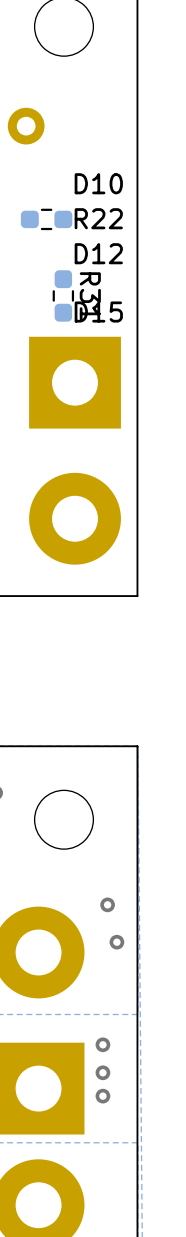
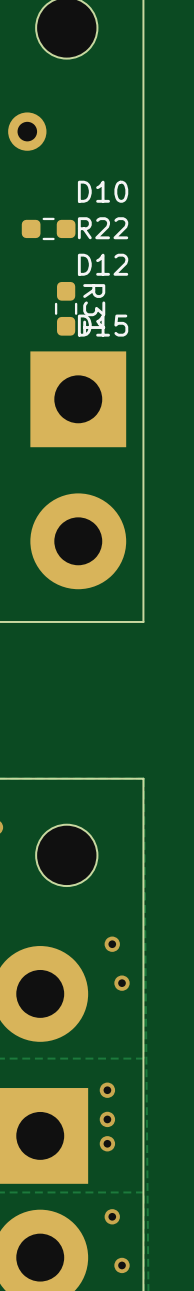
via: none -> (112, 1216)
via: none -> (122, 1265)

